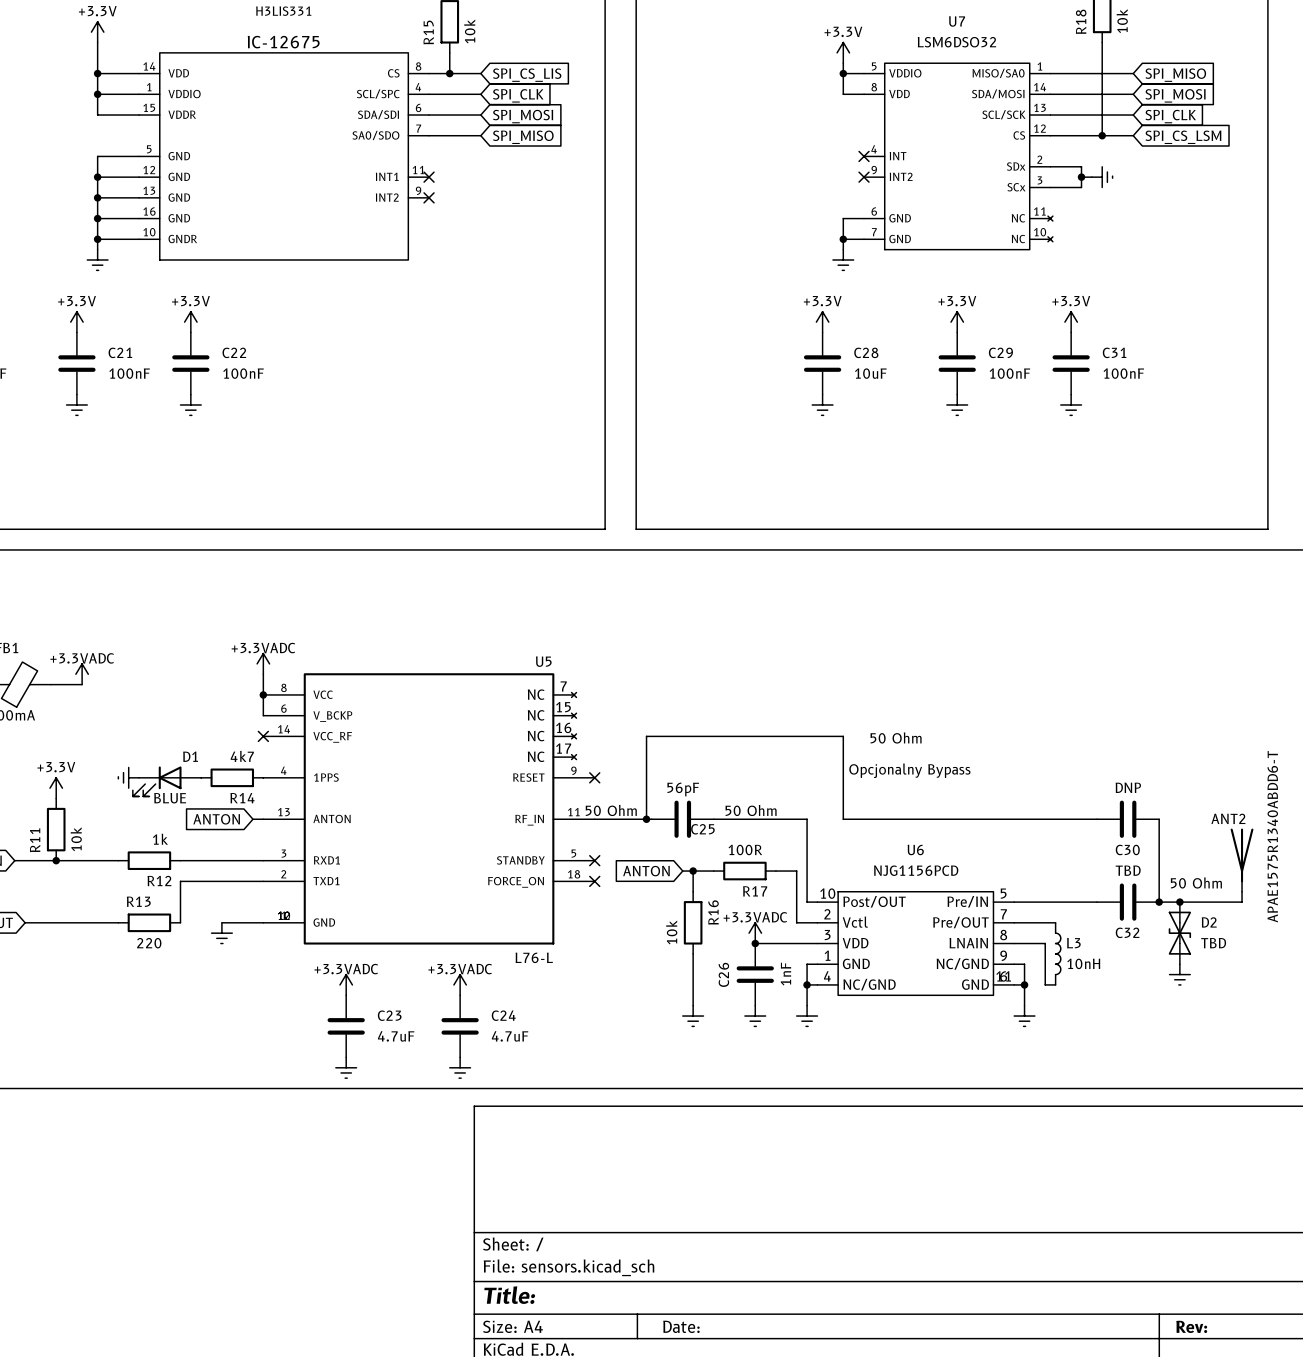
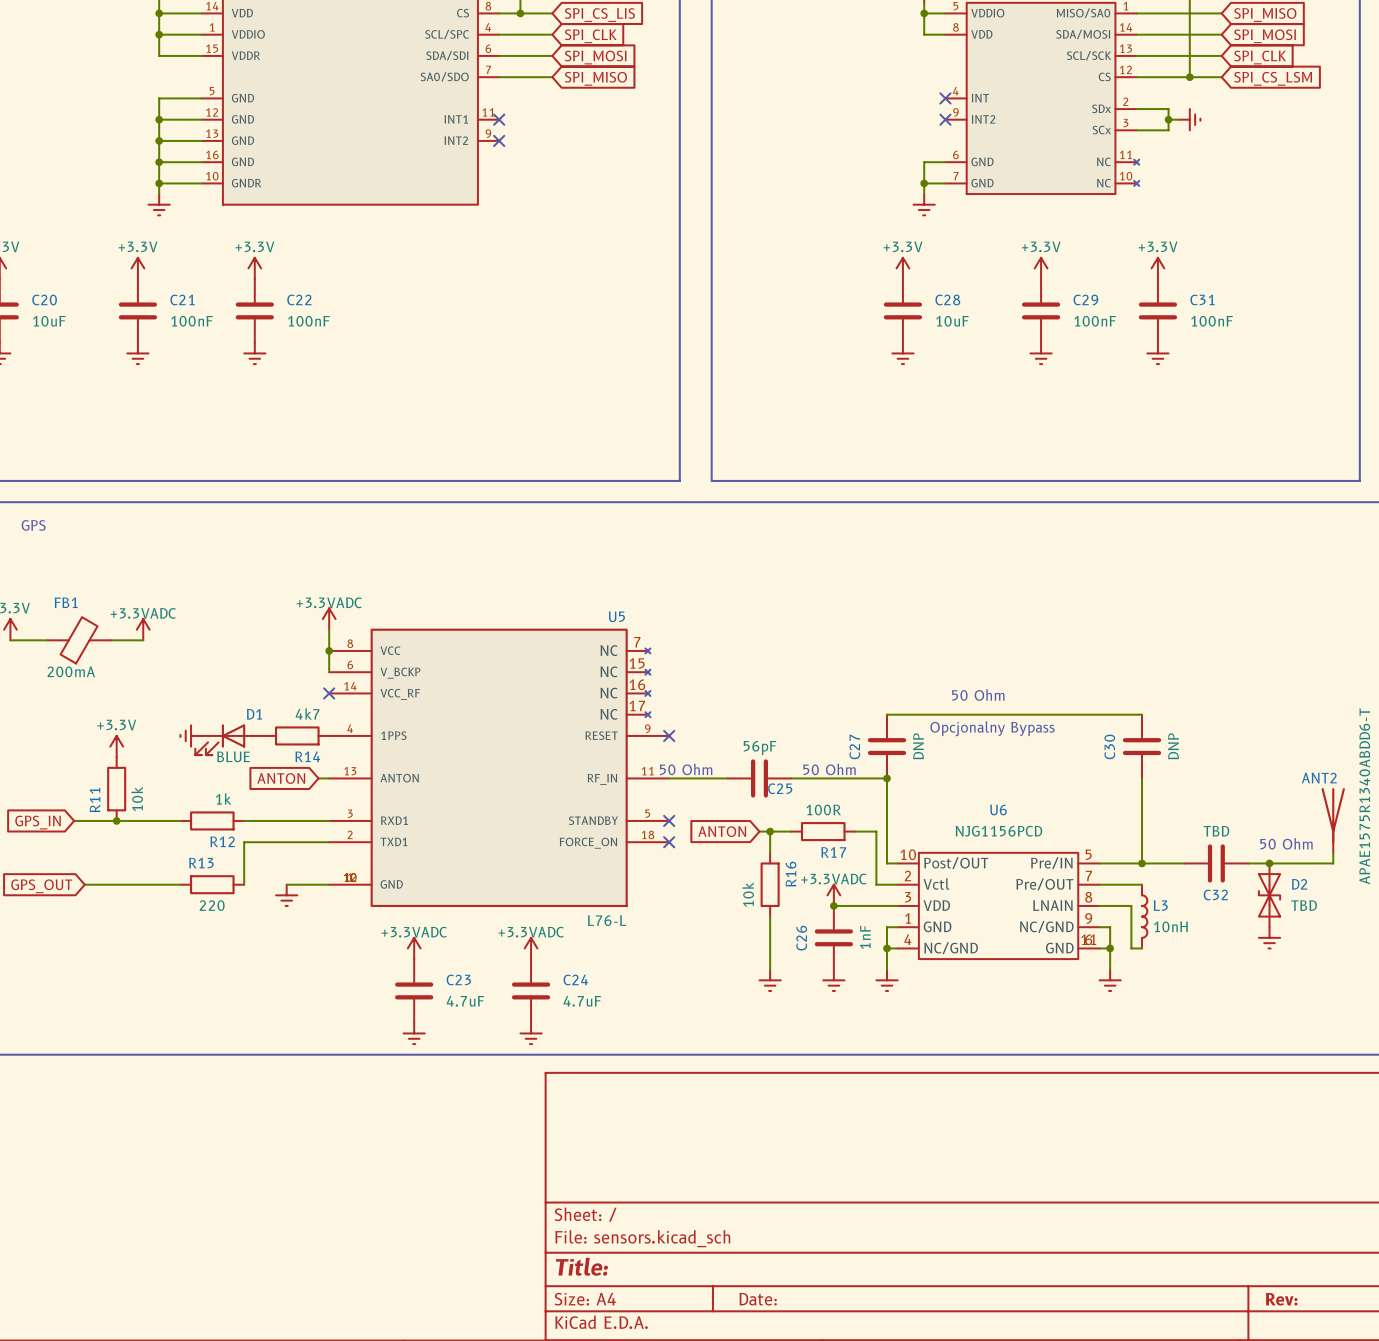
wire: none -> (887, 714) (1142, 714)
C27: none -> DNP (887, 746)
wire: (646, 819) (646, 736) (843, 736) (843, 819) (1097, 819) -> none
junction: (646, 819) -> none
junction: none -> (887, 778)
C30 rotation: 0° (1128, 819) -> 90° clockwise (1142, 746)
C30 position: (1128, 819) -> (1142, 746)
wire: (1159, 819) (1159, 902) -> (1142, 778) (1142, 863)
junction: none -> (1142, 863)
junction: (1159, 902) -> none

